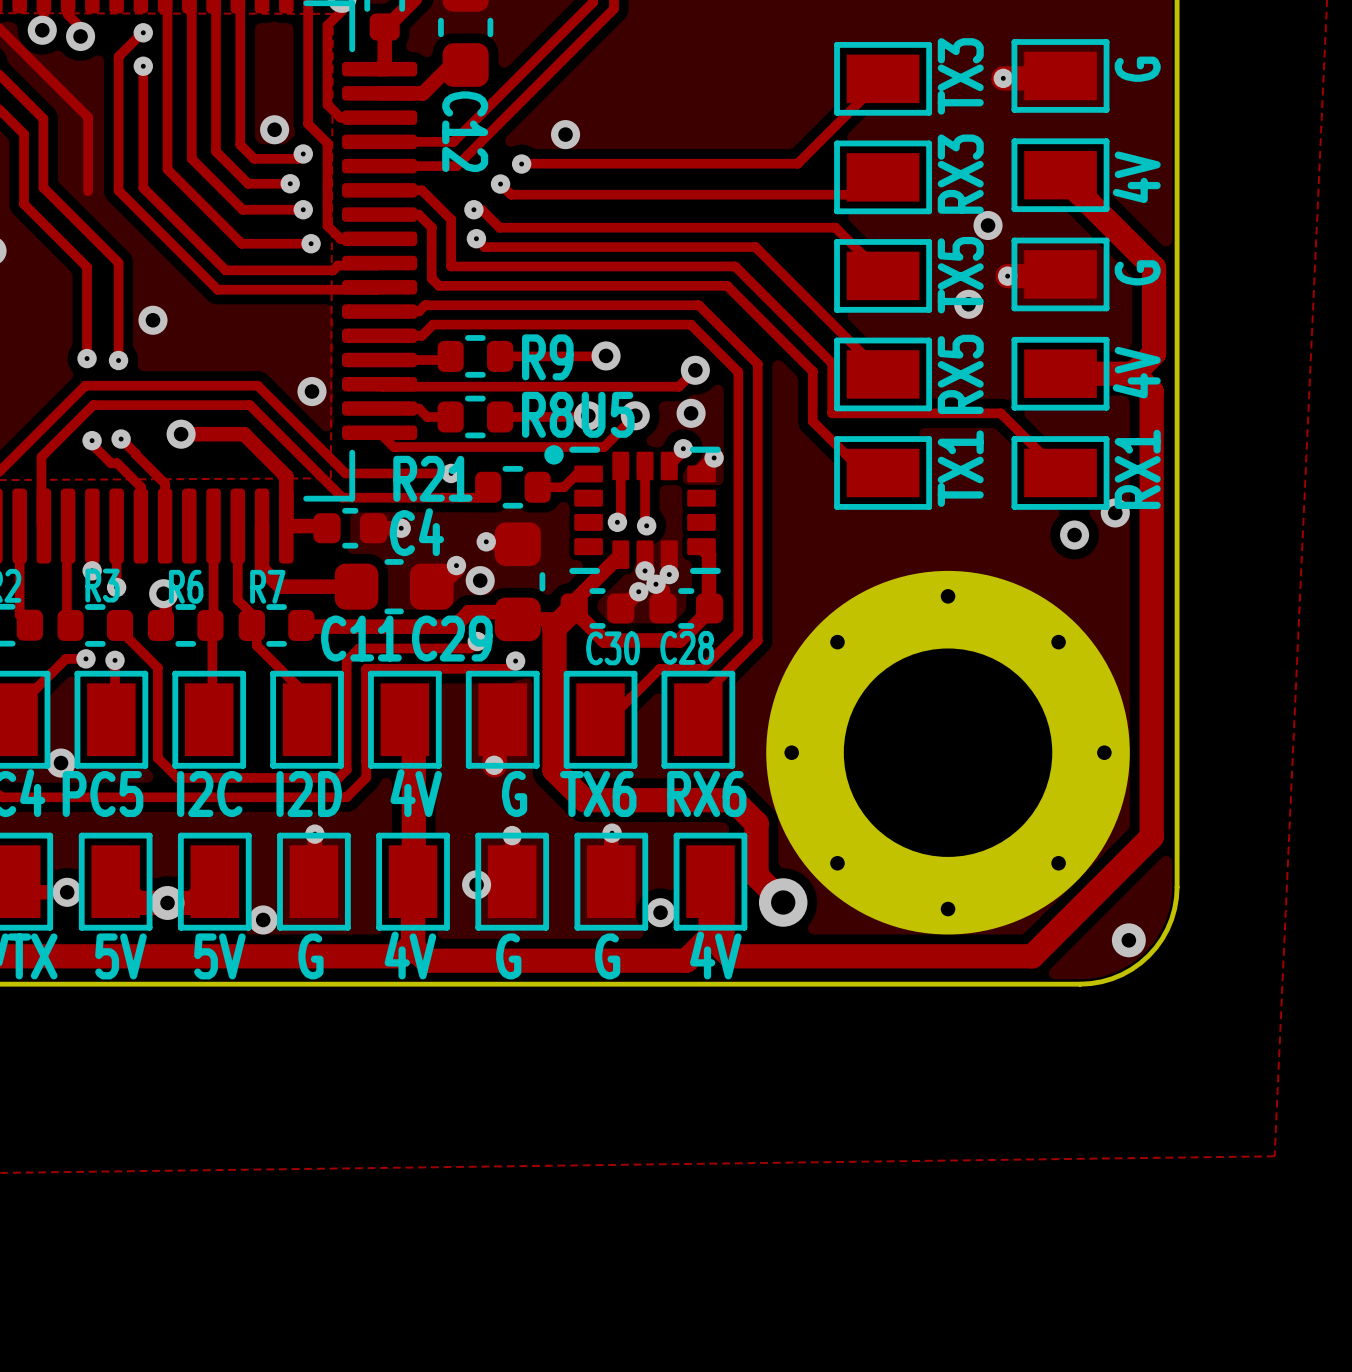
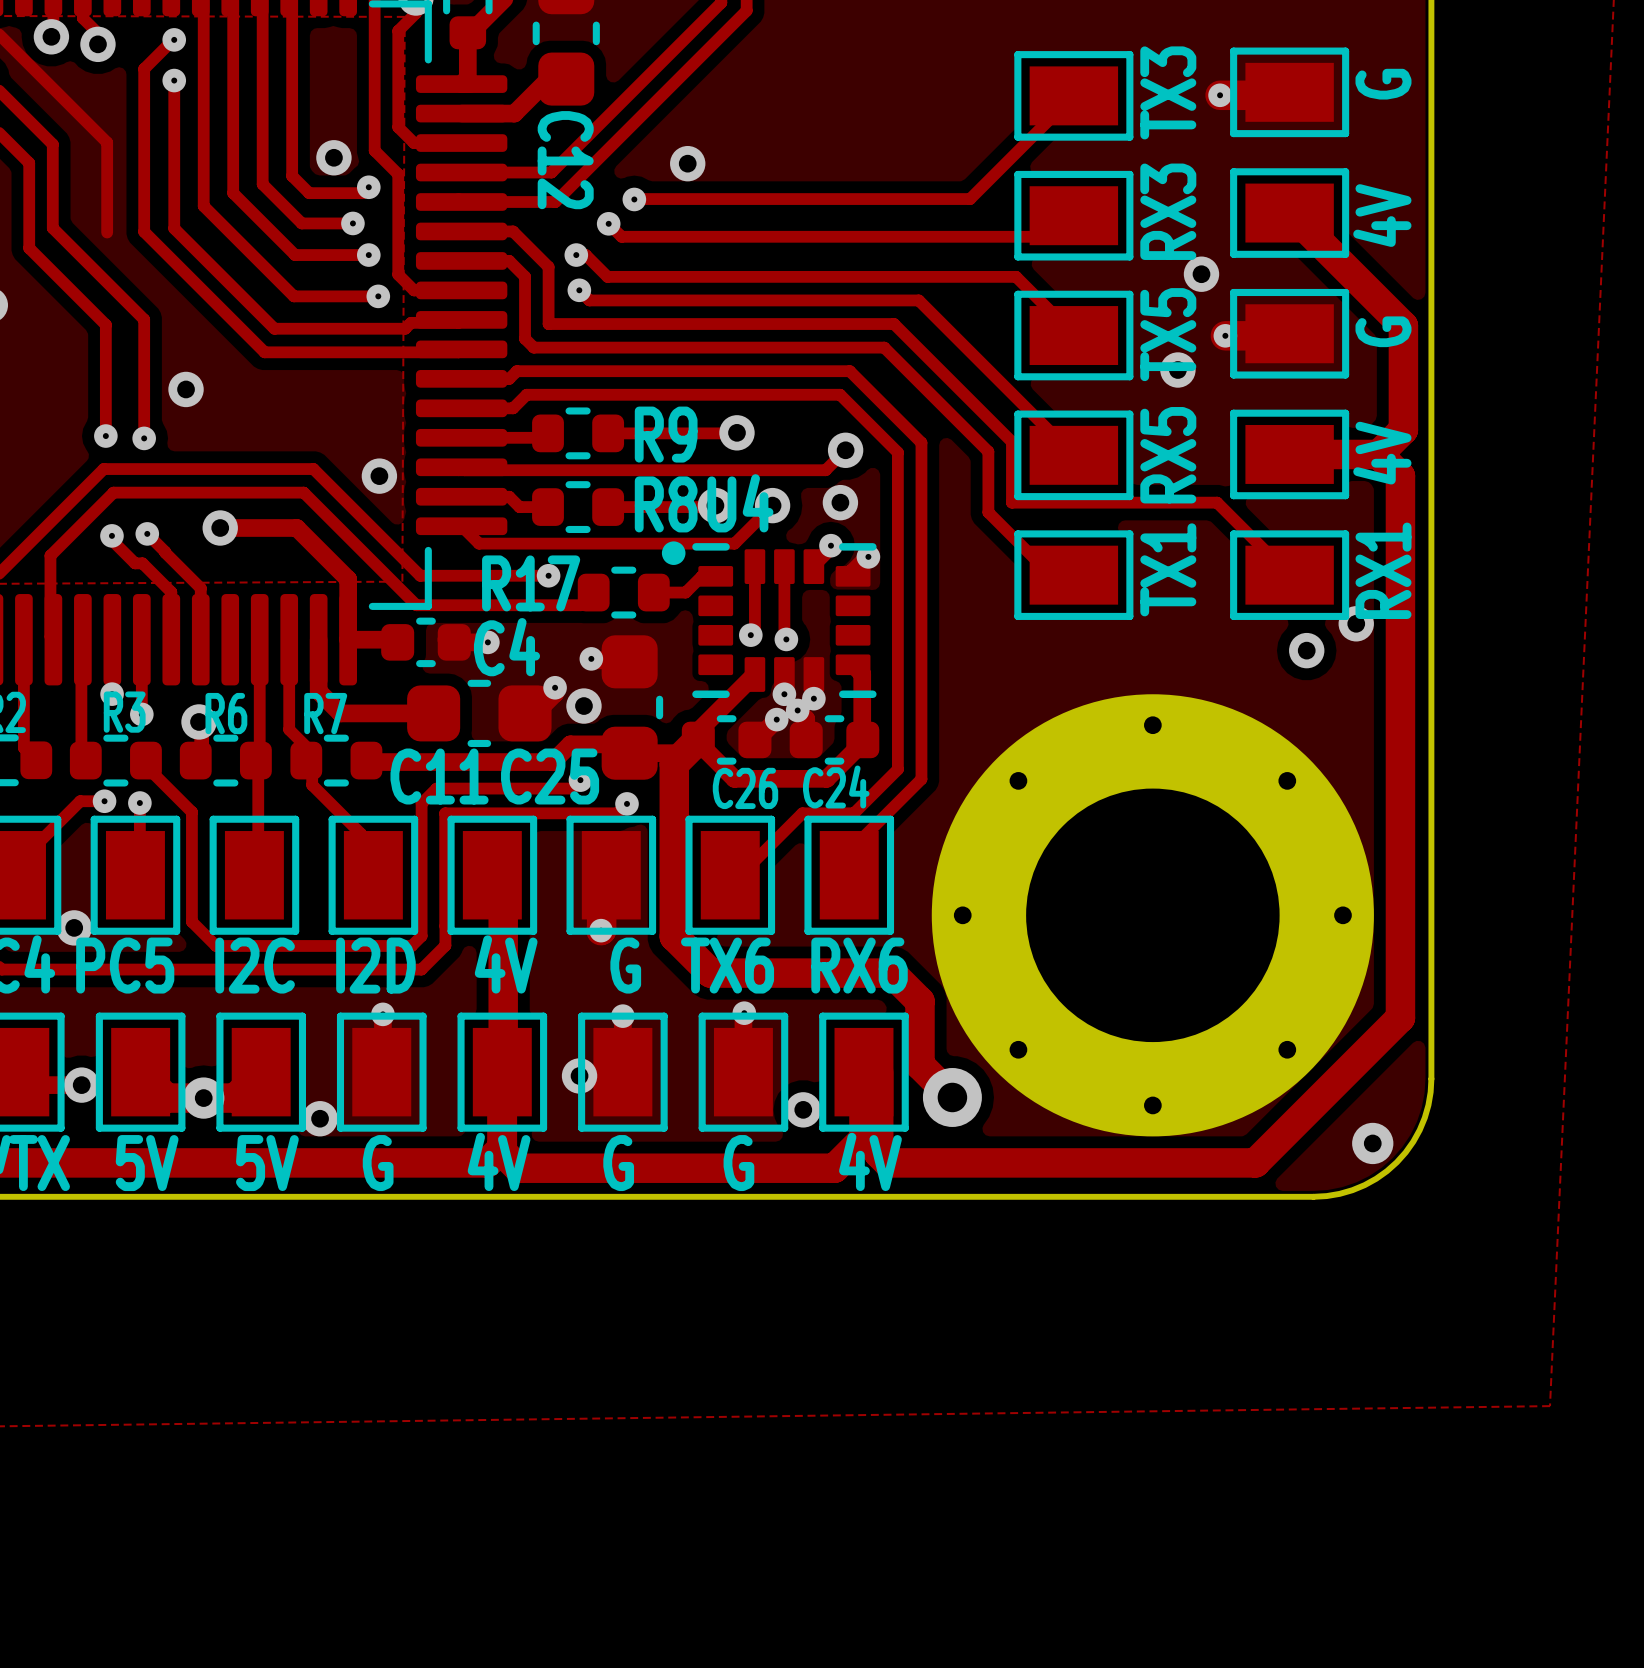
U5 name: U5 (608, 414) -> U4 (740, 503)
R21 name: R21 (432, 478) -> R17 (531, 583)
C29 name: C29 (452, 638) -> C25 (550, 776)
C28 name: C28 (687, 647) -> C24 (836, 787)
C30 name: C30 (613, 648) -> C26 (745, 788)

